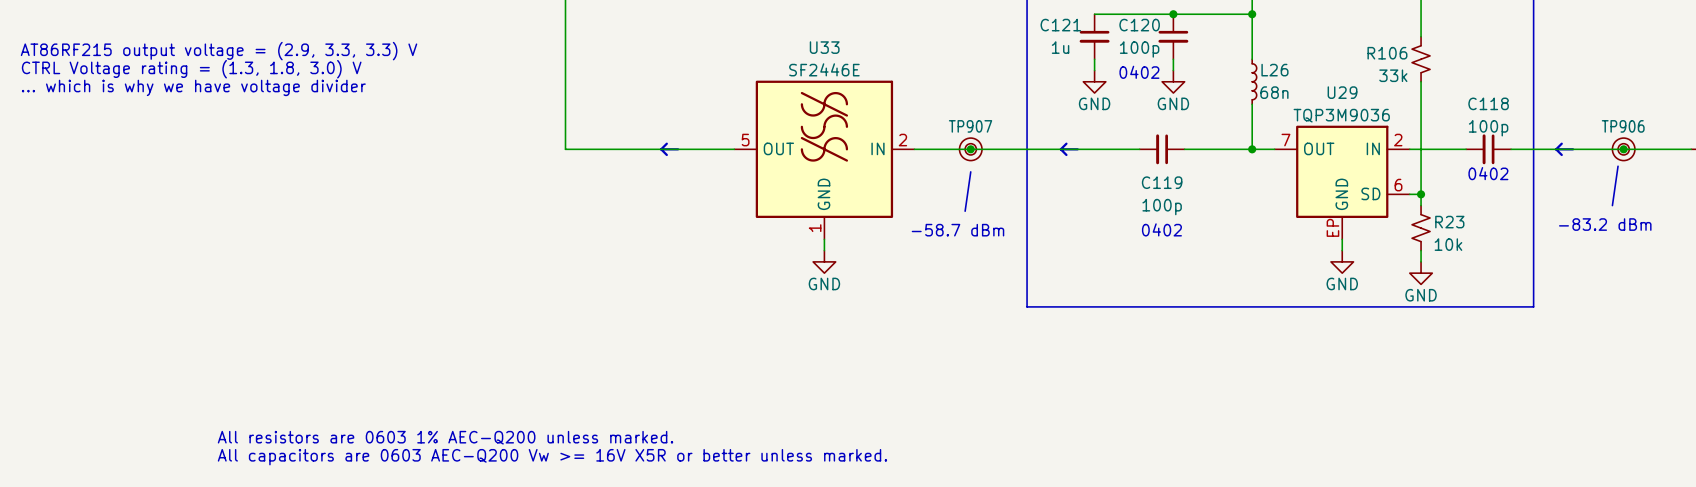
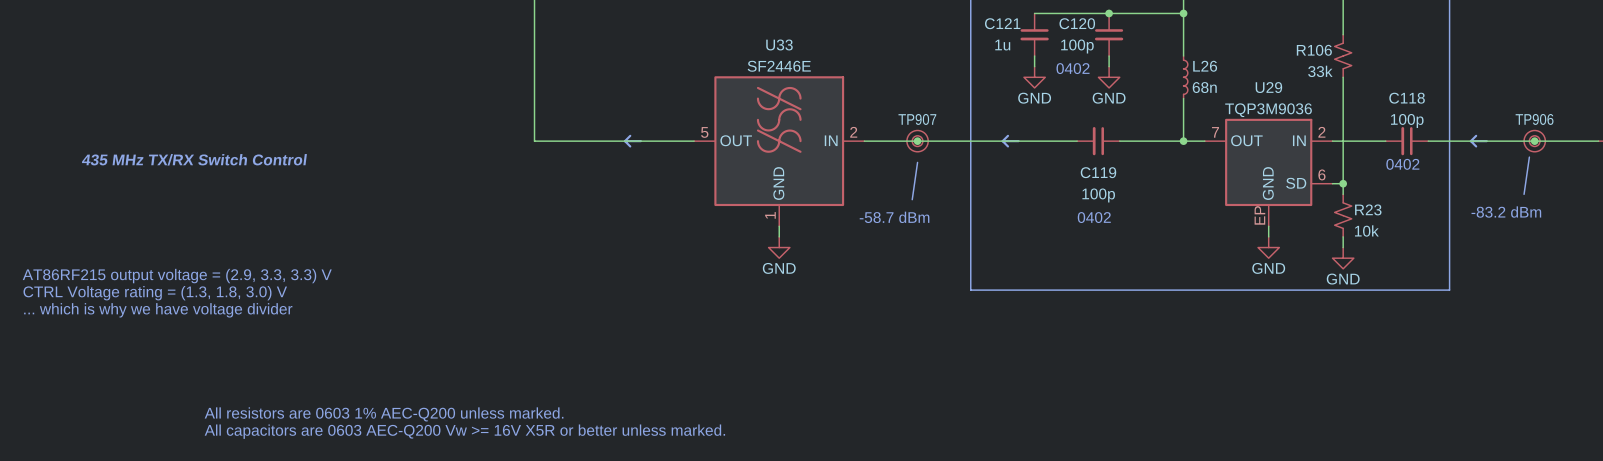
text: AT86RF215 output voltage = (2.9, 3.3, 3.3) V (219, 51) -> none
text: CTRL Voltage rating = (1.3, 1.8, 3.0) V (191, 69) -> none
text: ... which is why we have voltage divider (193, 87) -> none
text: none -> 435 MHz TX/RX Switch Control (194, 159)
text: none -> AT86RF215 output voltage = (2.9, 3.3, 3.3) V (177, 276)
text: none -> CTRL Voltage rating = (1.3, 1.8, 3.0) V (155, 293)
text: none -> ... which is why we have voltage divider (158, 310)

